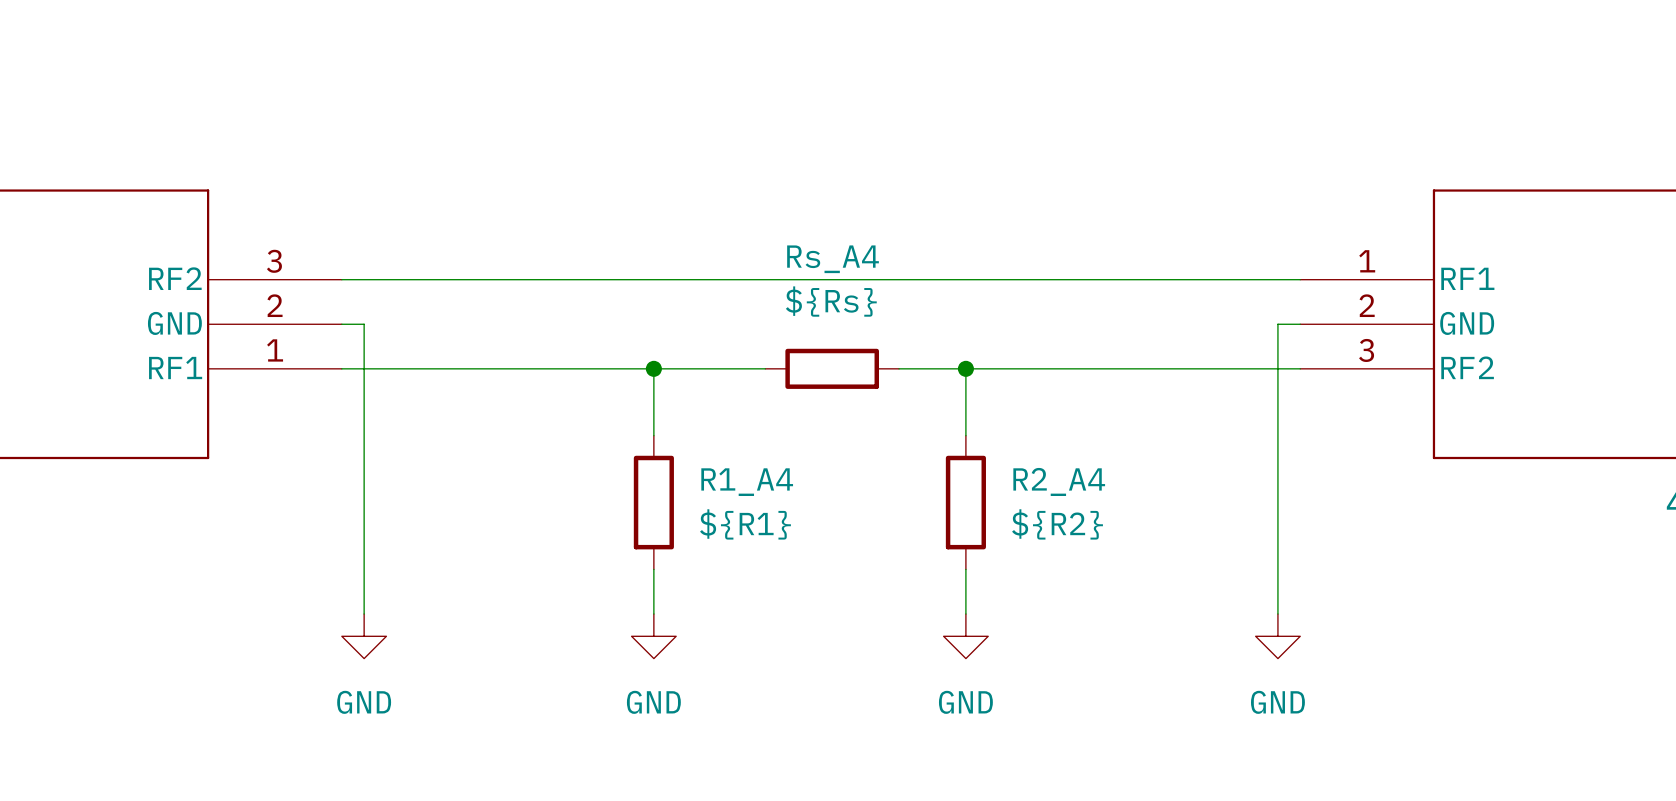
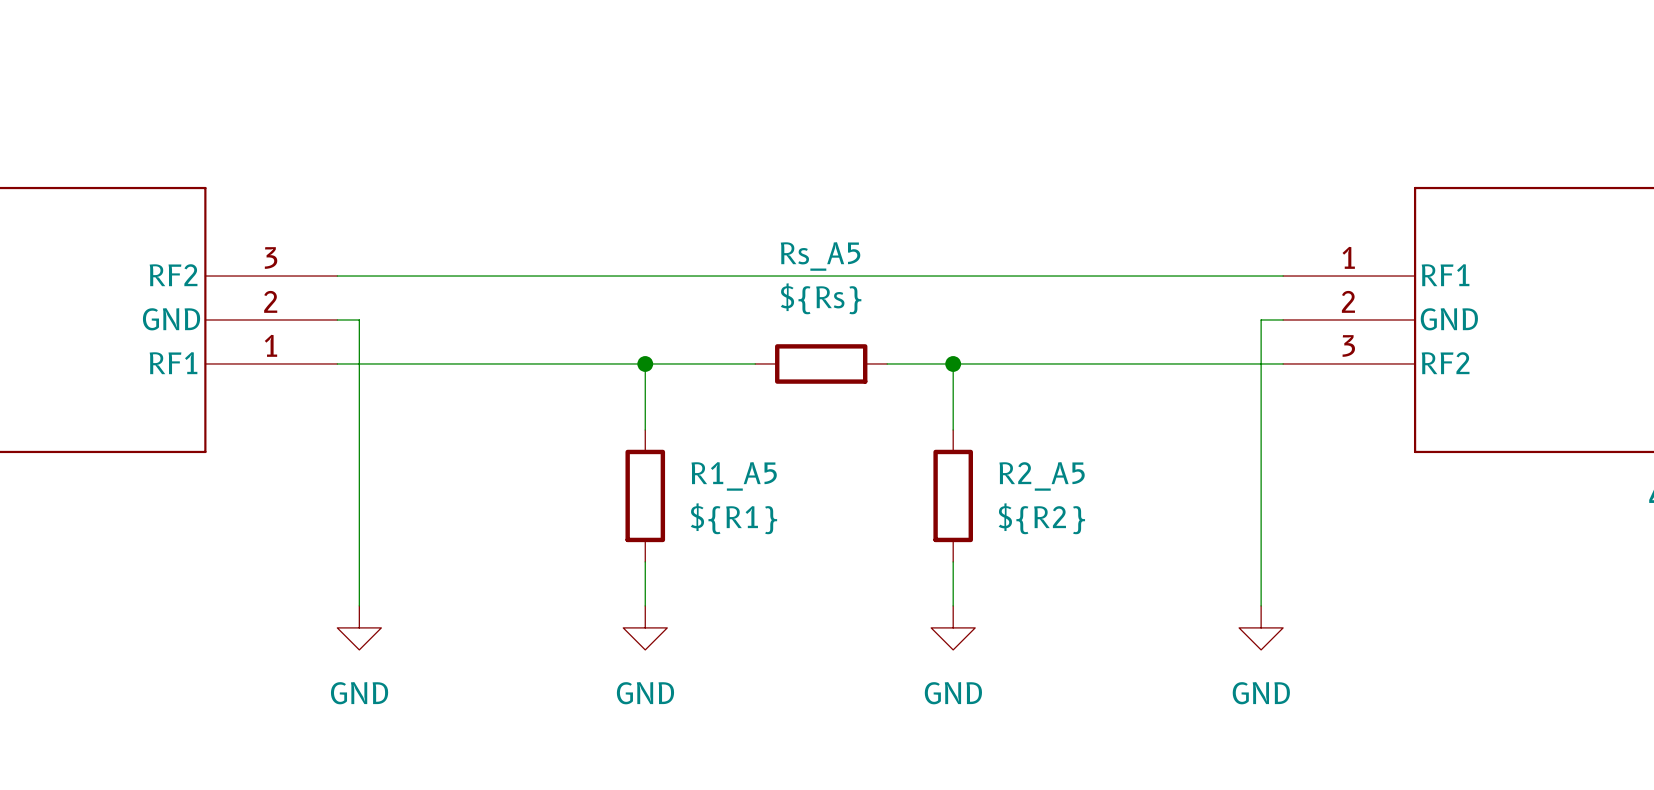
Rs_A4 name: Rs_A4 (833, 259) -> Rs_A5 (820, 256)
R2_A4 name: R2_A4 (1059, 481) -> R2_A5 (1042, 476)
R1_A4 name: R1_A4 (747, 482) -> R1_A5 (734, 476)

